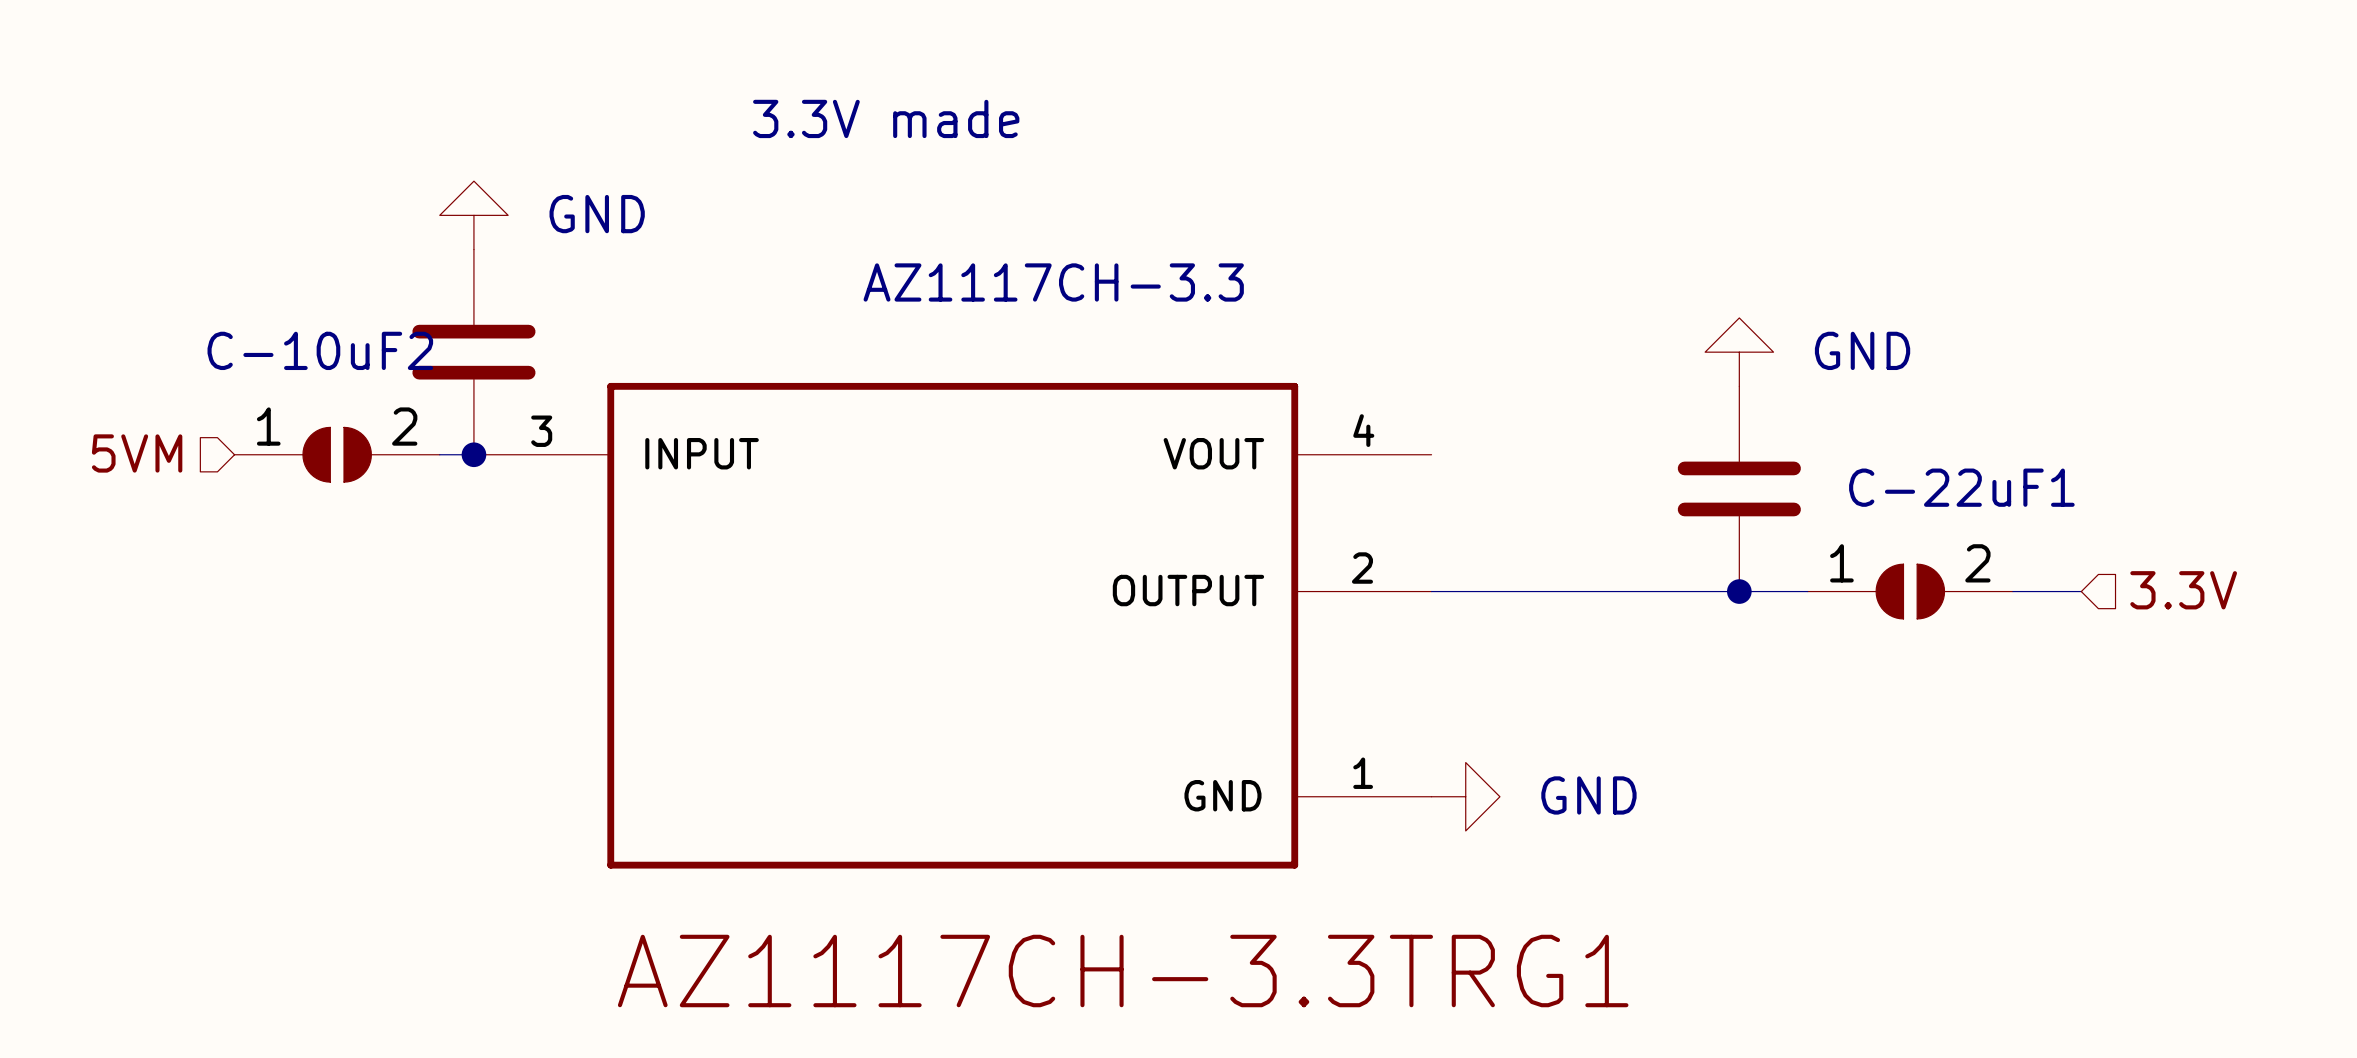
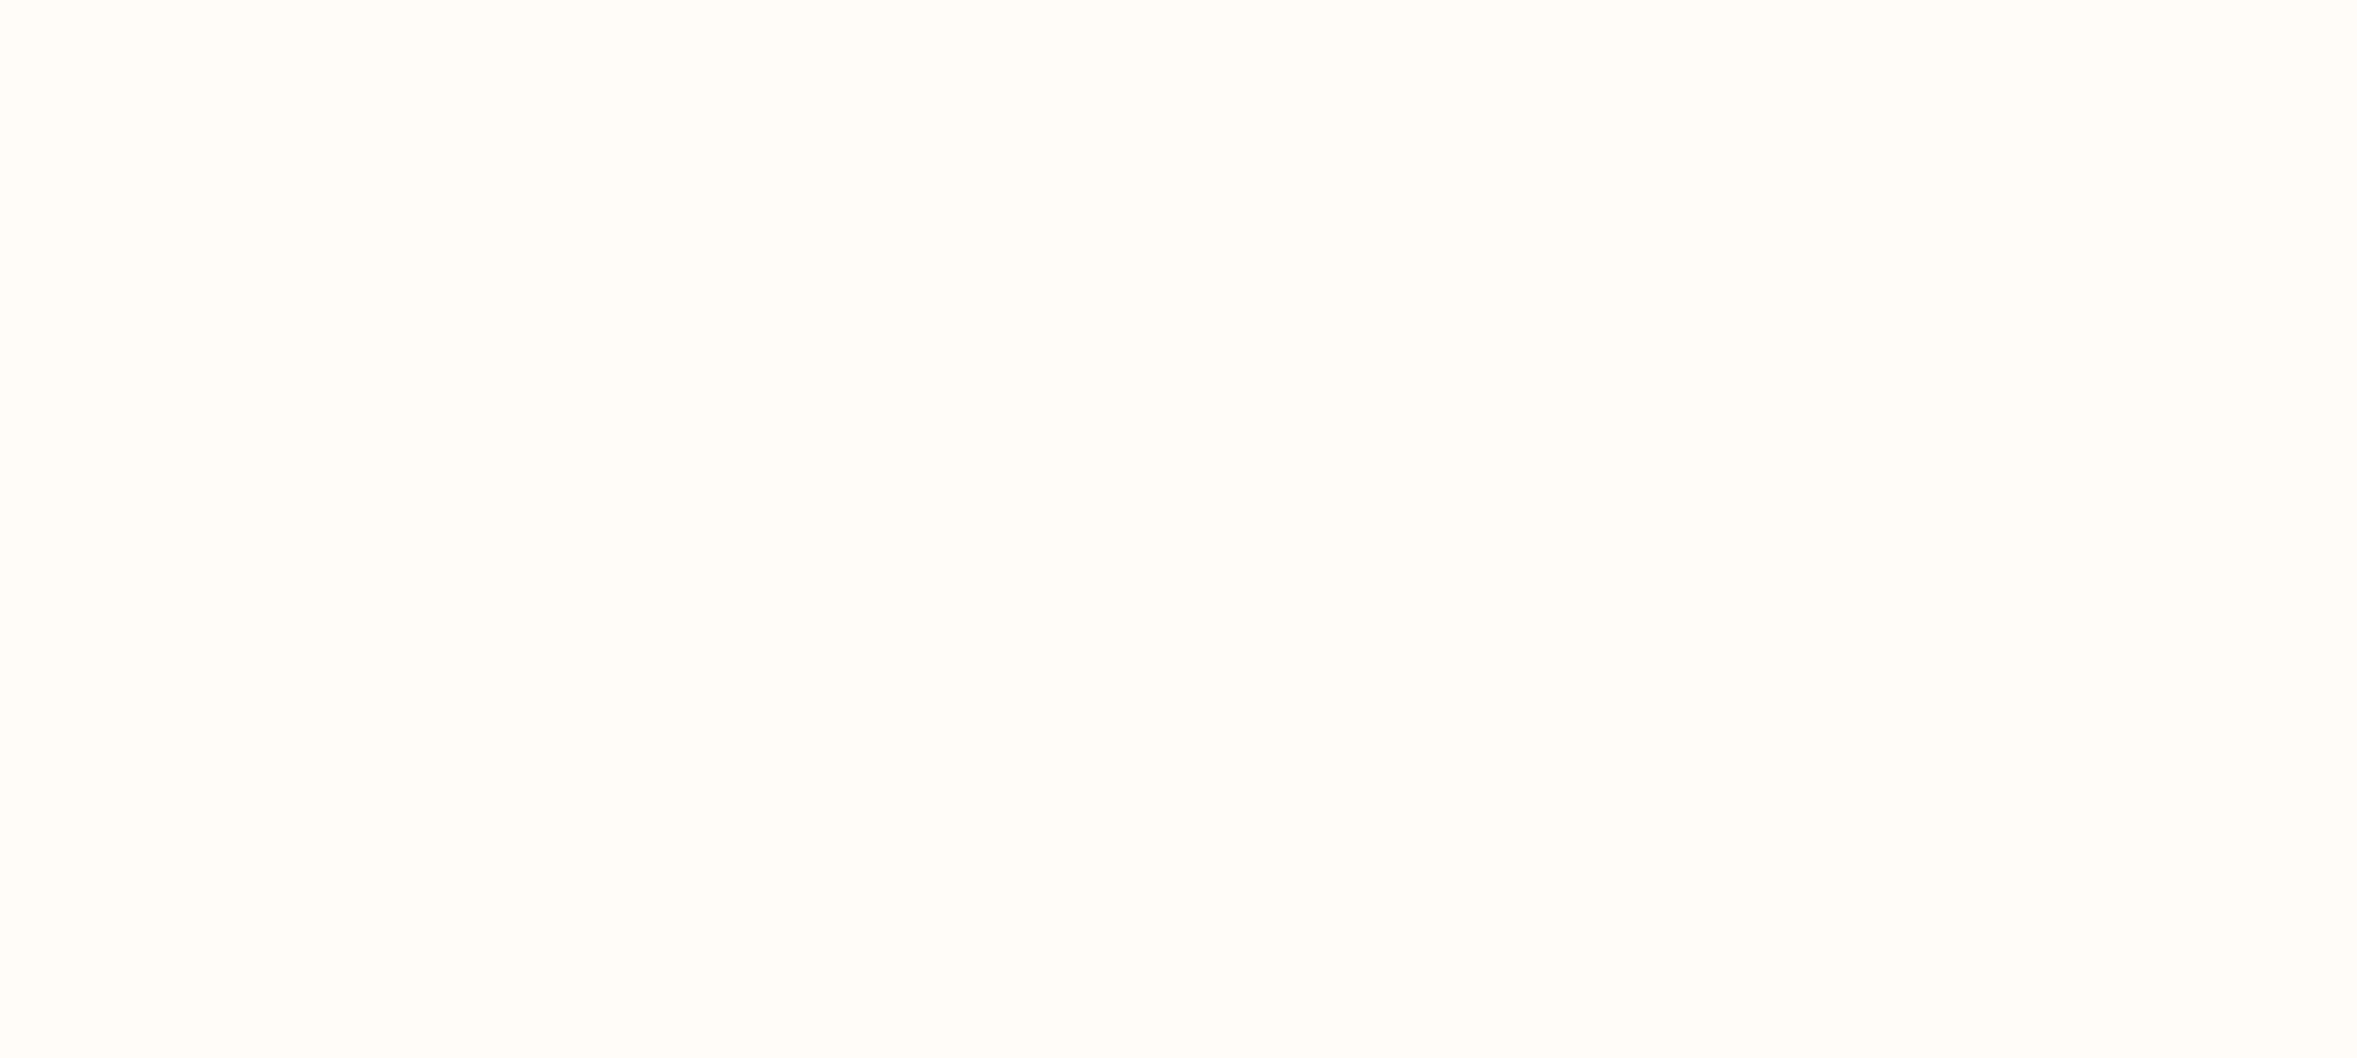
text: 3.3V made (886, 118) -> none
power symbol: GND (473, 215) -> none
C-10uF2: (473, 352) -> none
power symbol: GND (1739, 352) -> none
hierarchical label: 5VM (137, 453) -> none
part: (337, 454) -> none
wire: (439, 454) (473, 454) -> none
junction: (473, 454) -> none
C-22uF1: (1739, 488) -> none
hierarchical label: 3.3V (2183, 590) -> none
wire: (1431, 591) (1807, 591) -> none
junction: (1739, 591) -> none
part: (1910, 591) -> none
wire: (2012, 591) (2081, 591) -> none
AZ1117CH-3.3: (952, 625) -> none
power symbol: GND (1465, 796) -> none

